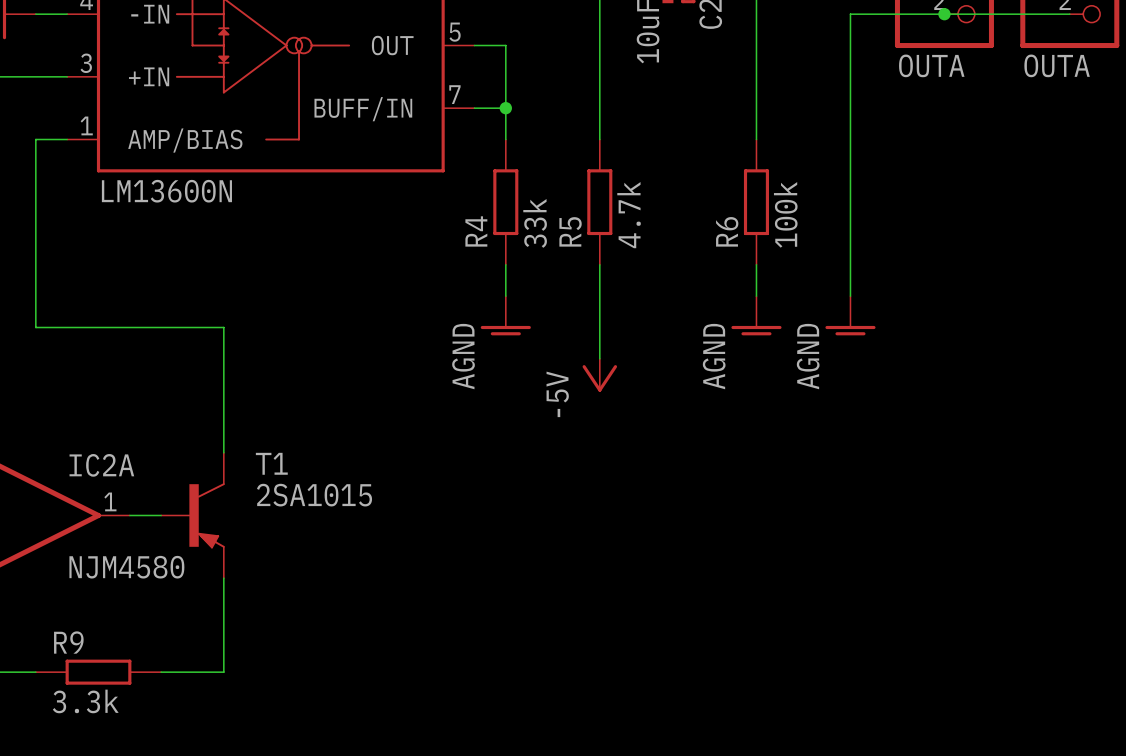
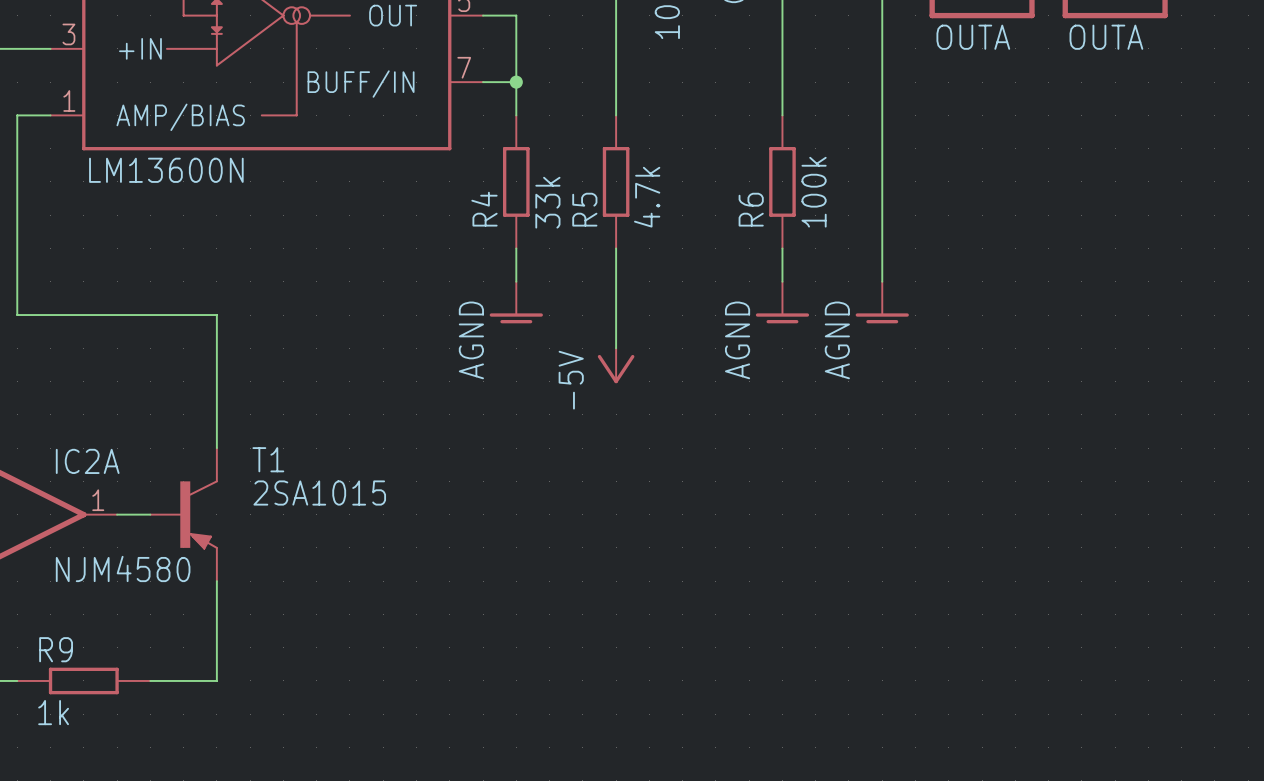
R9 value: 3.3k (85, 701) -> 1k (53, 712)

